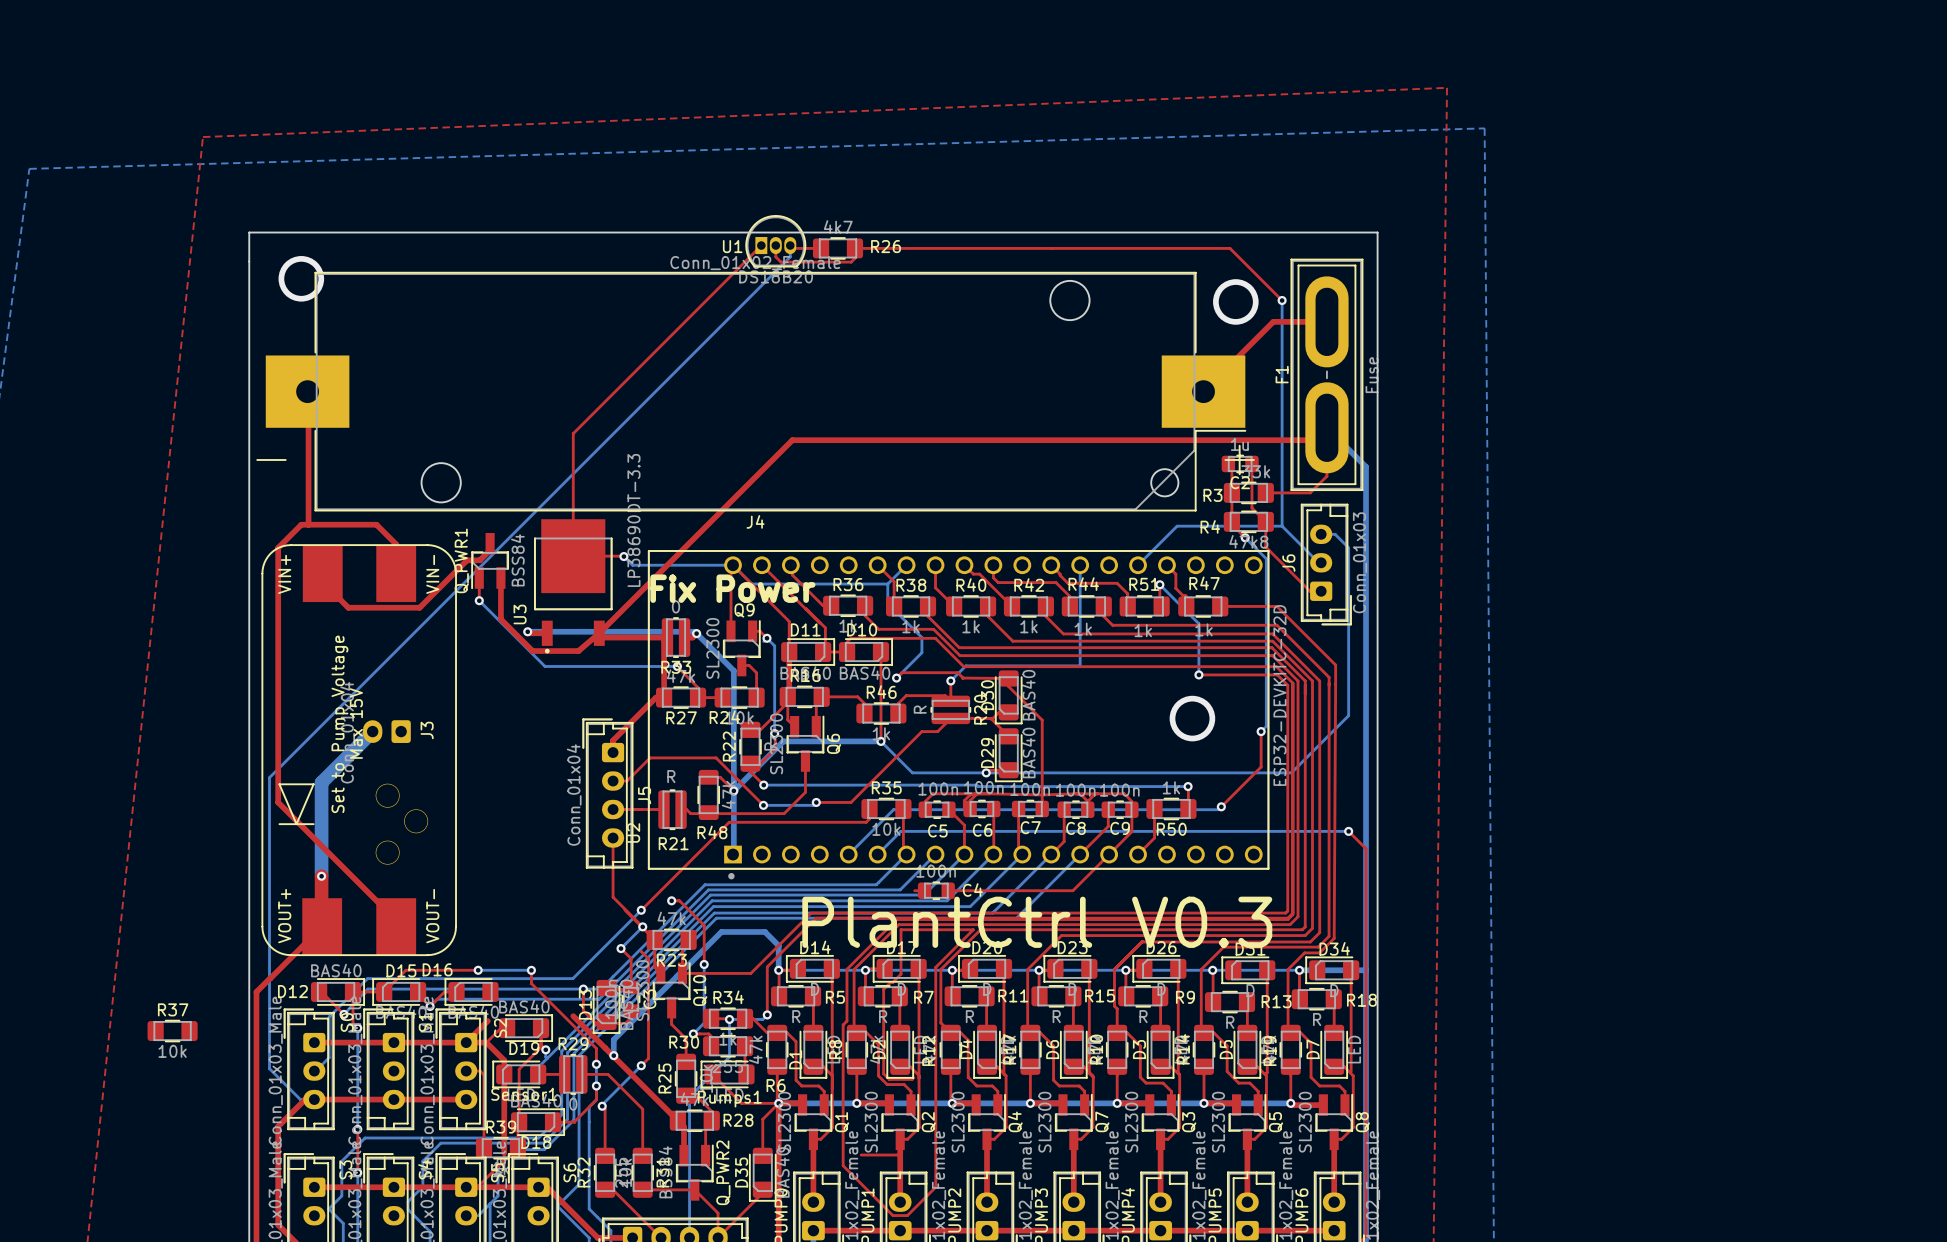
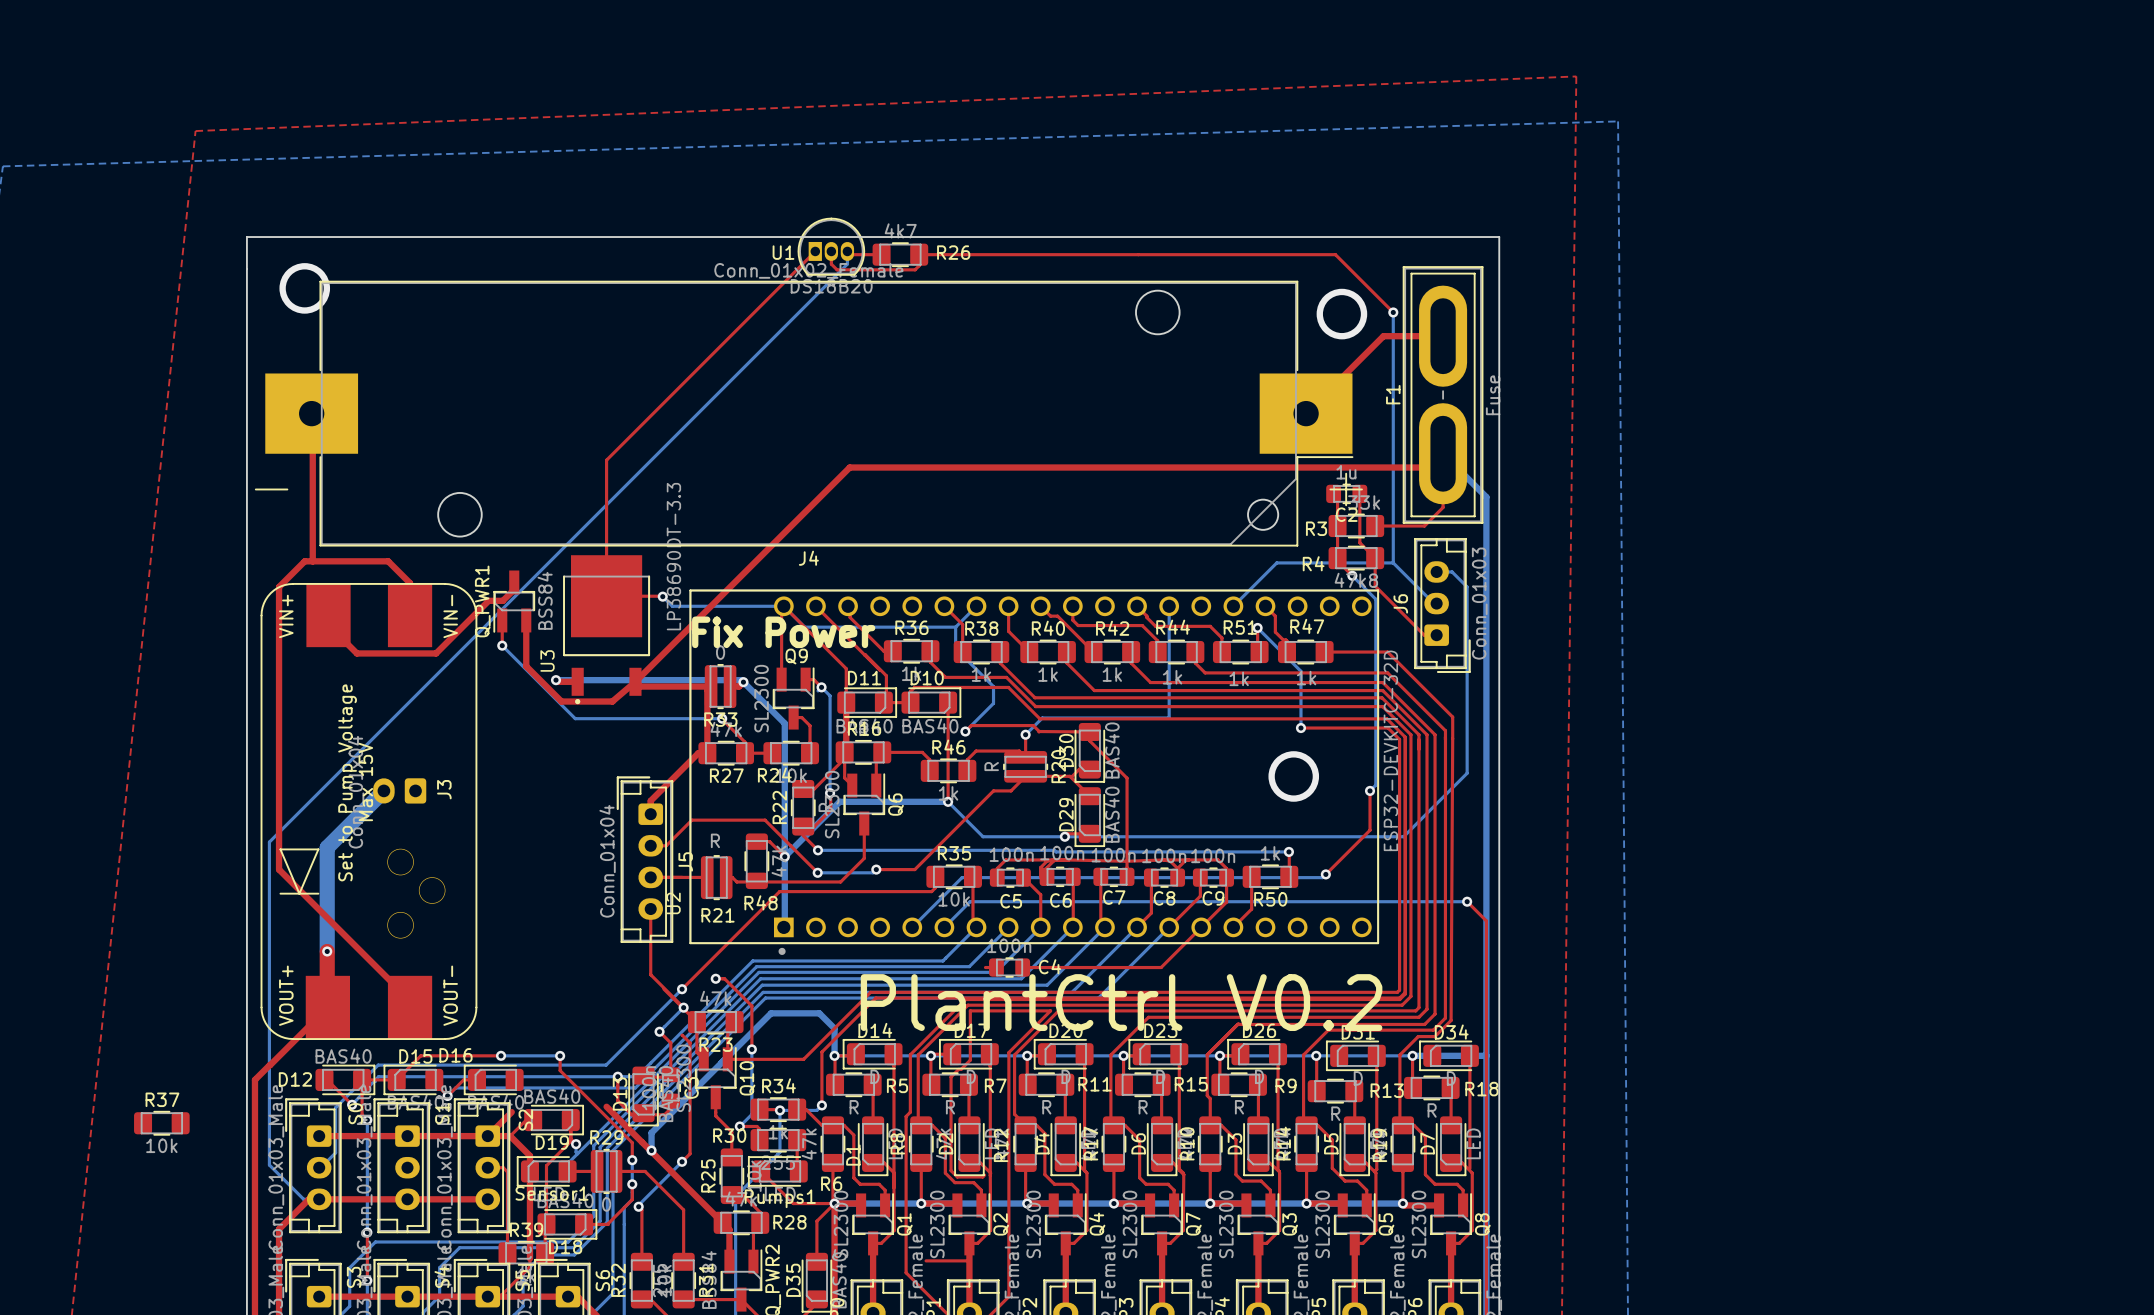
text: PlantCtrl V0.3 (1037, 922) -> PlantCtrl V0.2 (1121, 1002)

